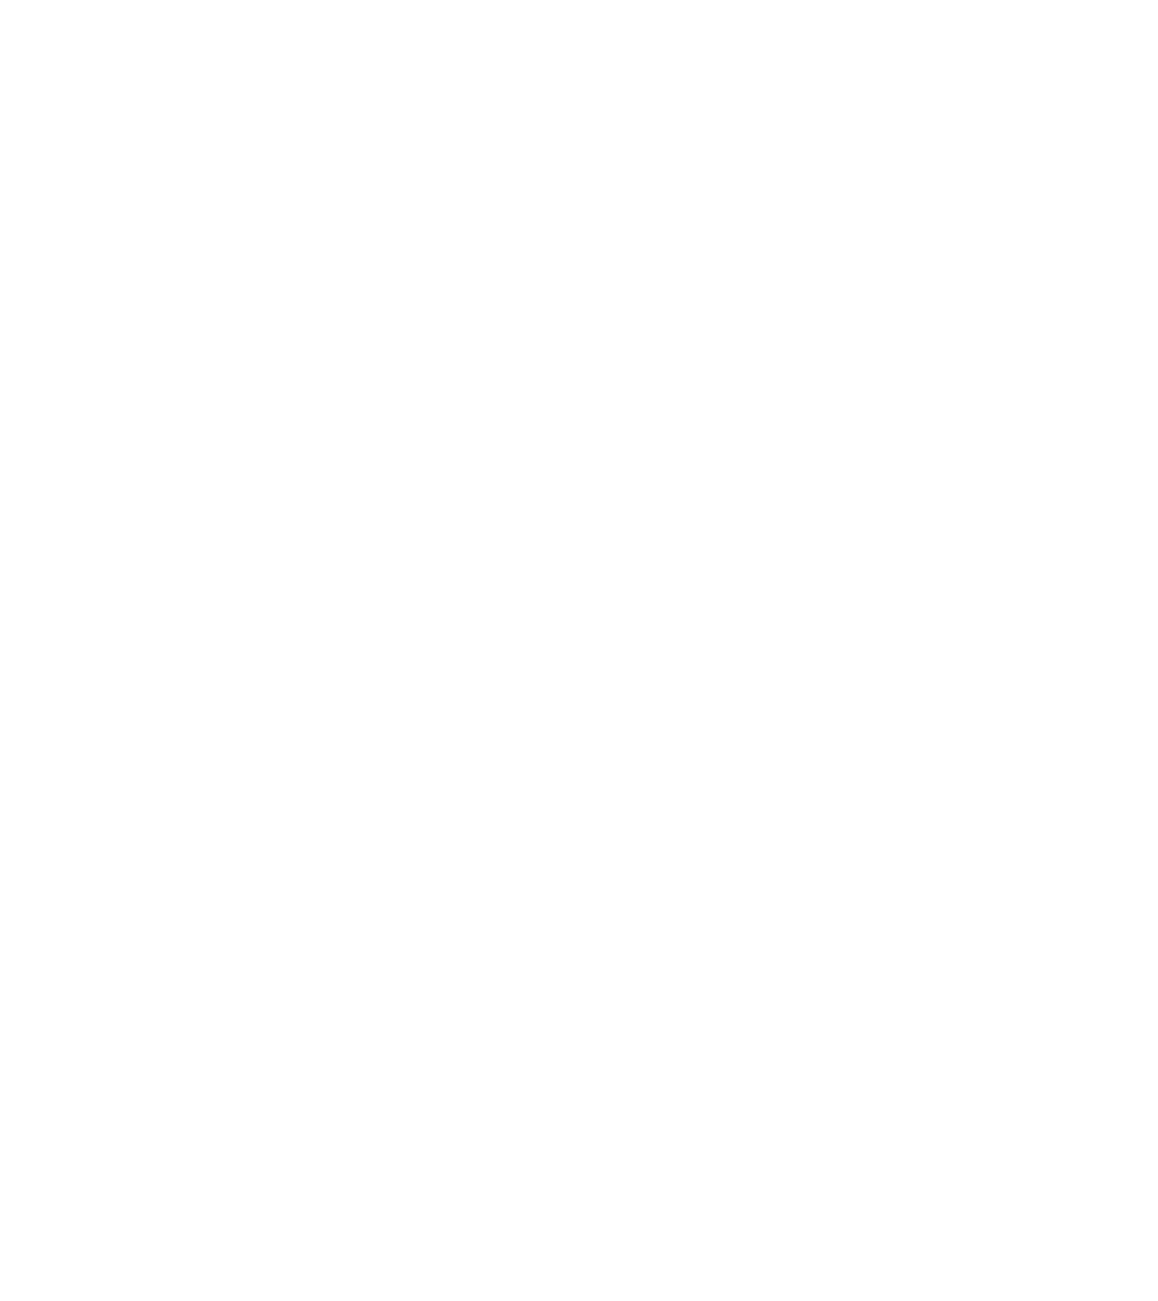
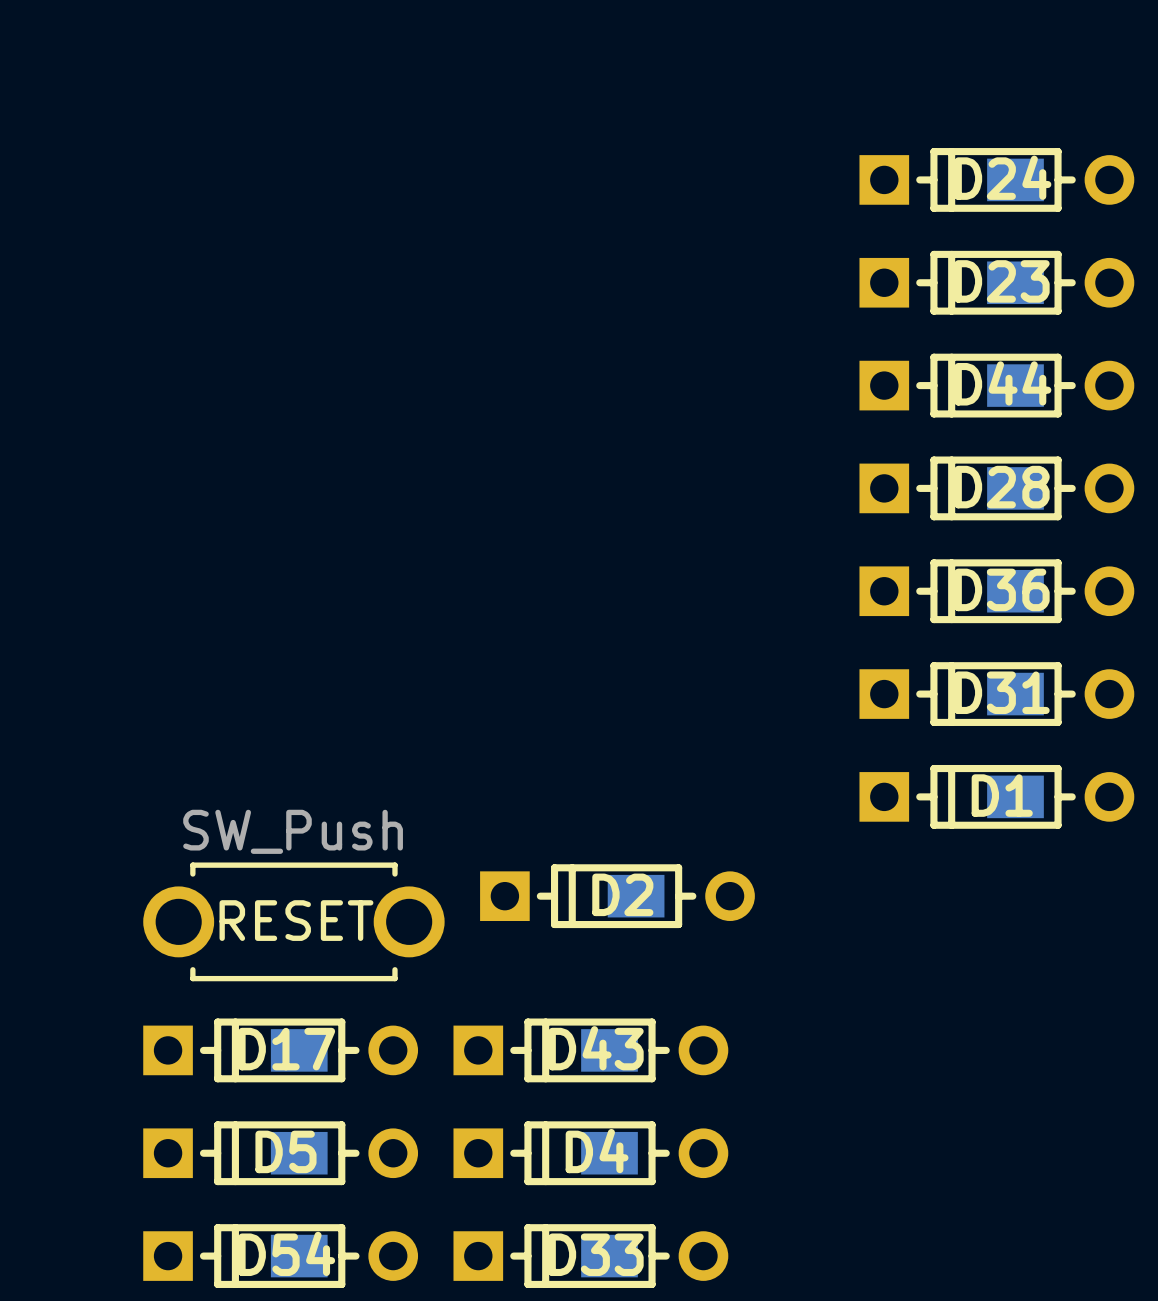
D24: none -> (996, 179)
D23: none -> (996, 282)
D44: none -> (996, 385)
D28: none -> (996, 488)
D36: none -> (996, 591)
D31: none -> (996, 694)
D1: none -> (996, 796)
D2: none -> (617, 896)
part: none -> SW_Push (293, 921)
D17: none -> (280, 1050)
D43: none -> (590, 1050)
D5: none -> (280, 1153)
D4: none -> (590, 1153)
D54: none -> (280, 1256)
D33: none -> (590, 1256)

